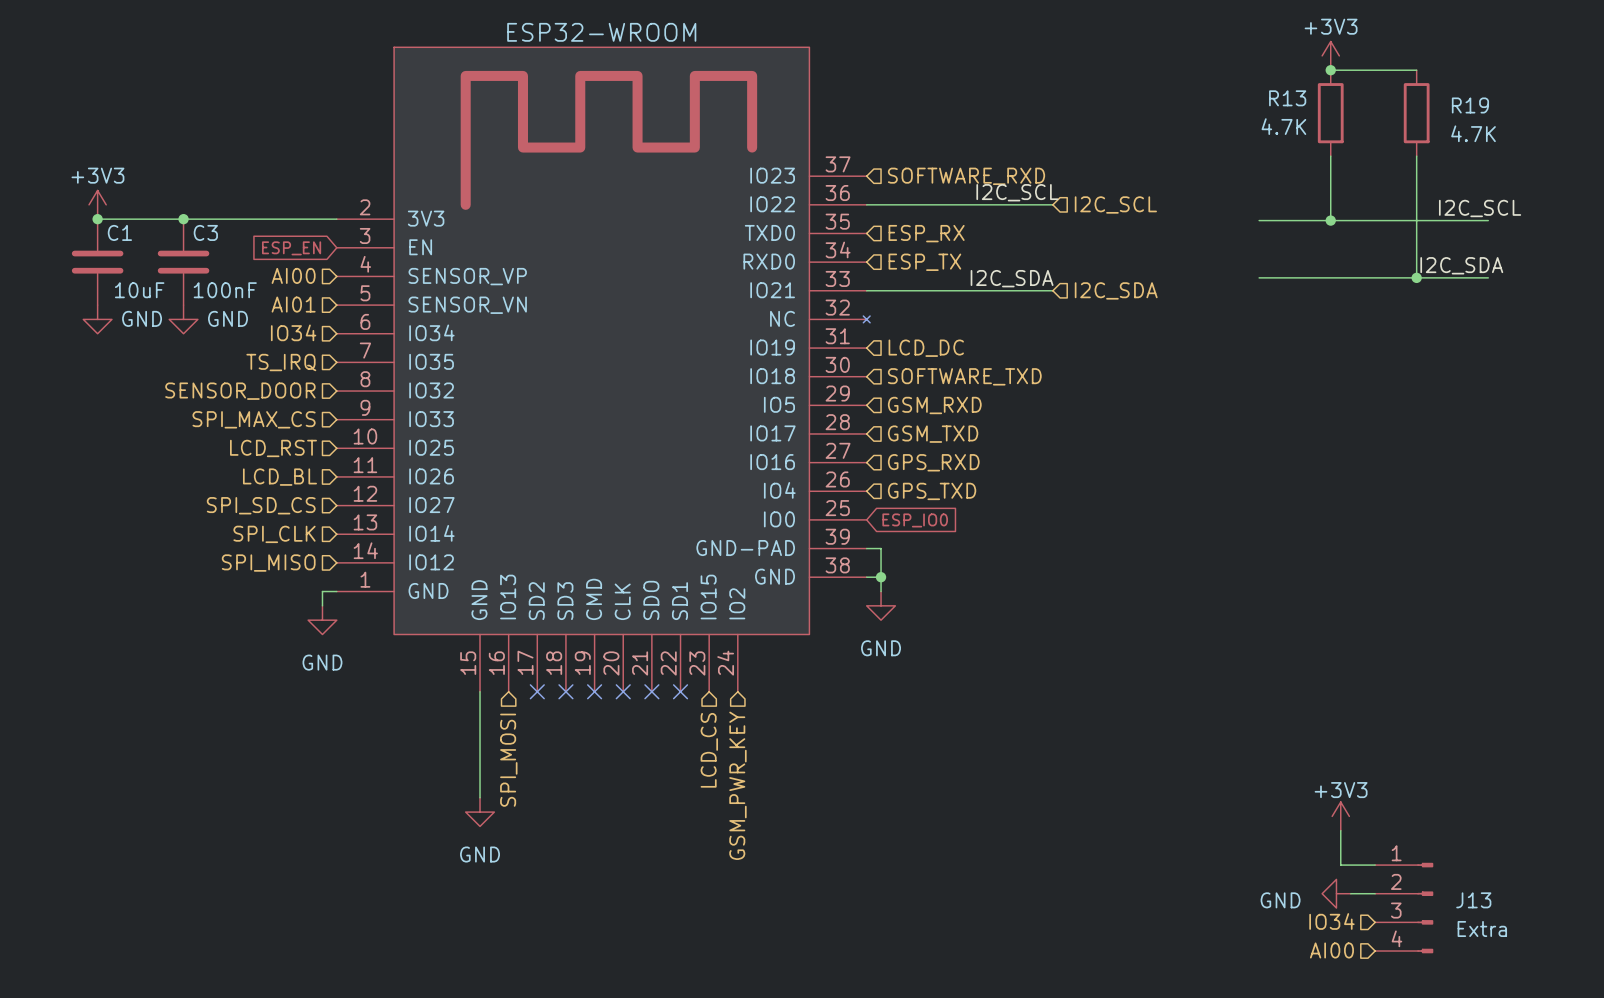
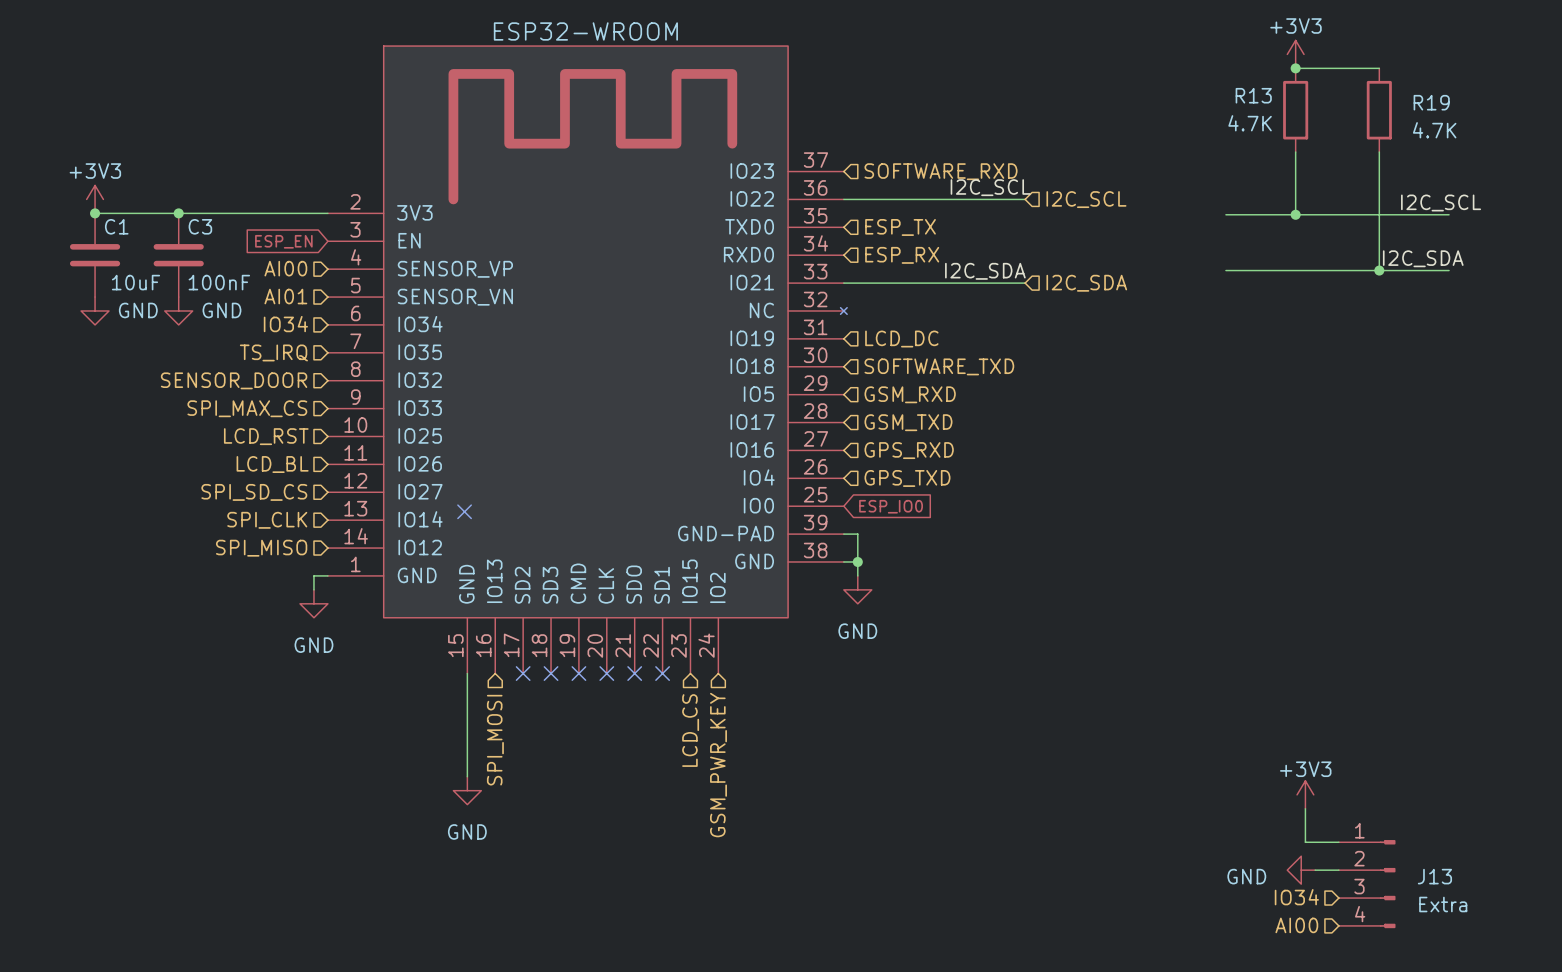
hierarchical label: ESP_RX (926, 233) -> ESP_TX (900, 227)
hierarchical label: ESP_TX (924, 262) -> ESP_RX (902, 255)
no-connect mark: none -> (464, 511)

